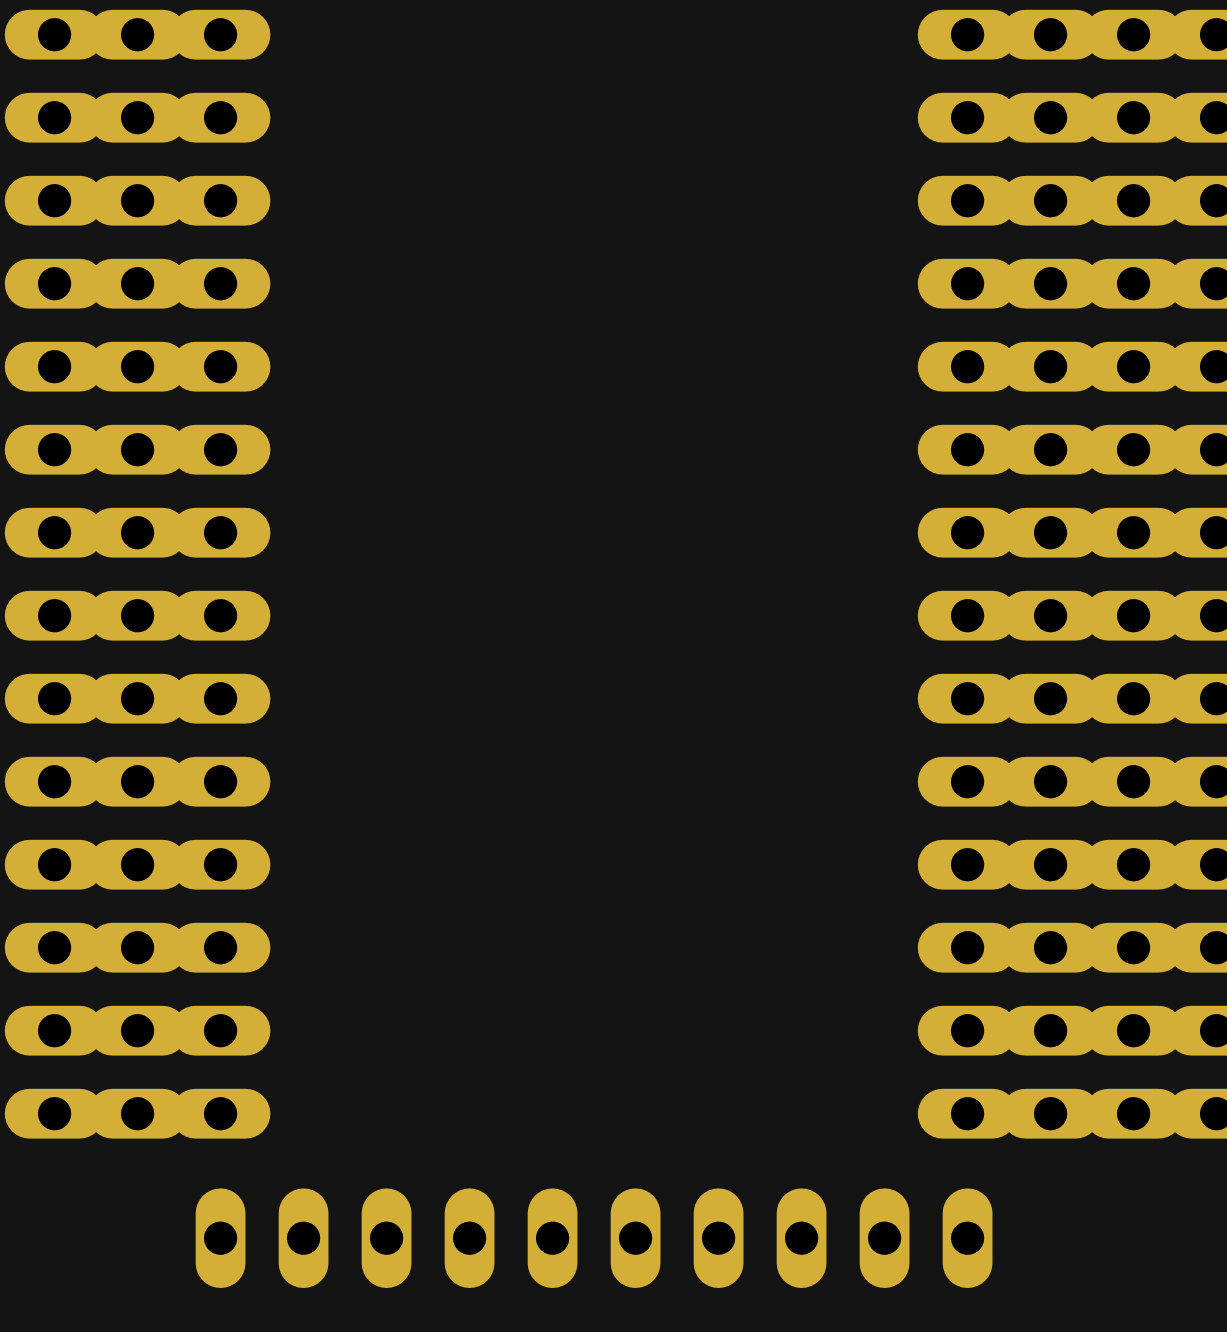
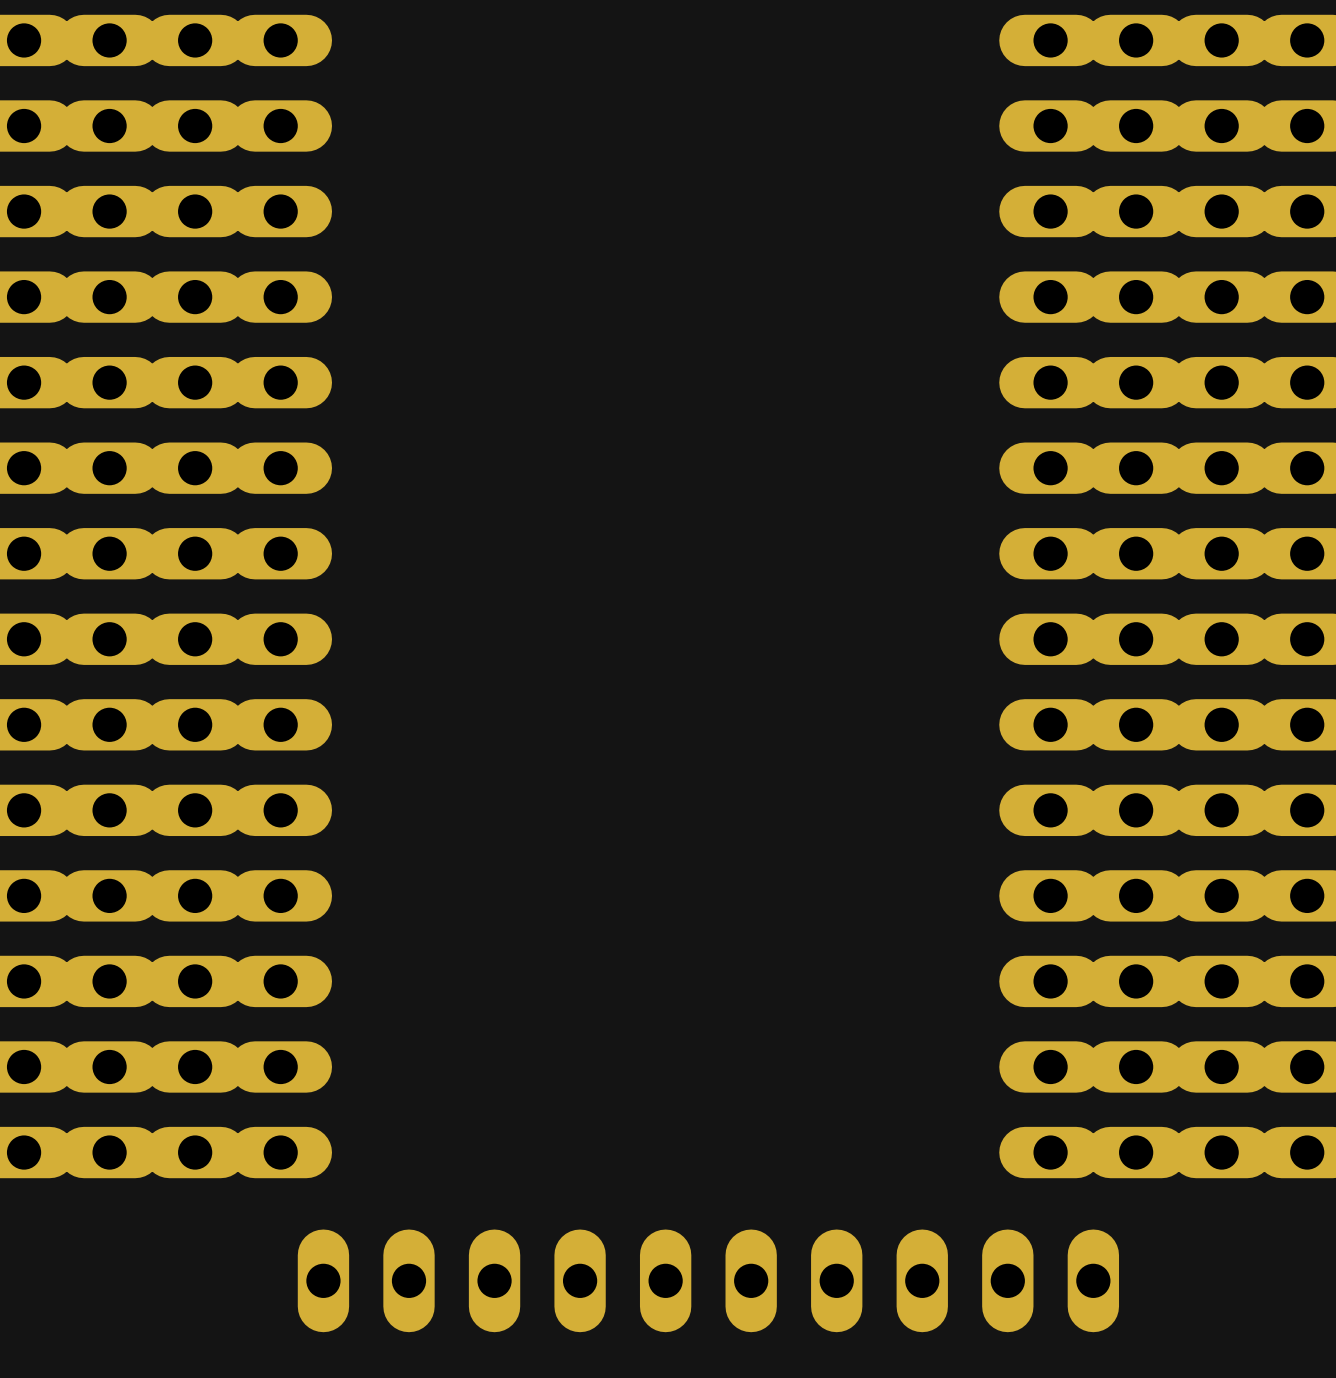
part position: (594, 1238) -> (708, 1280)

